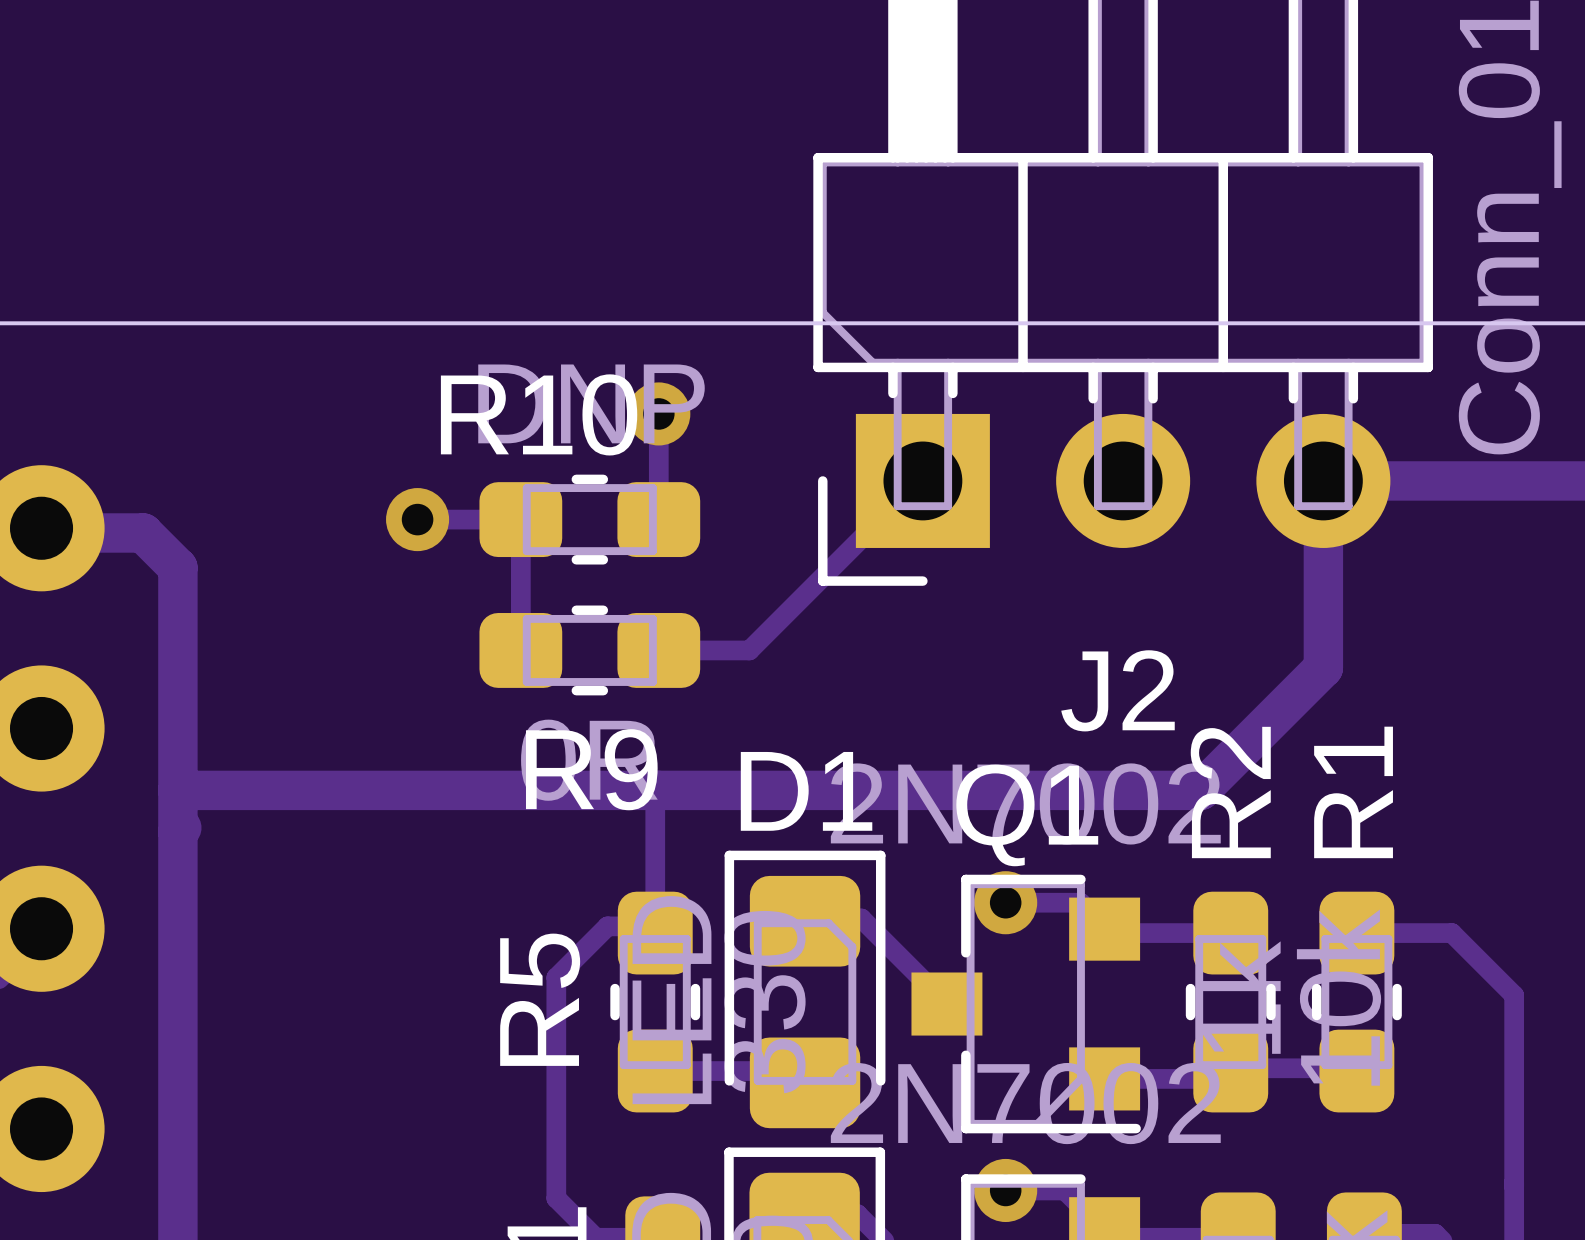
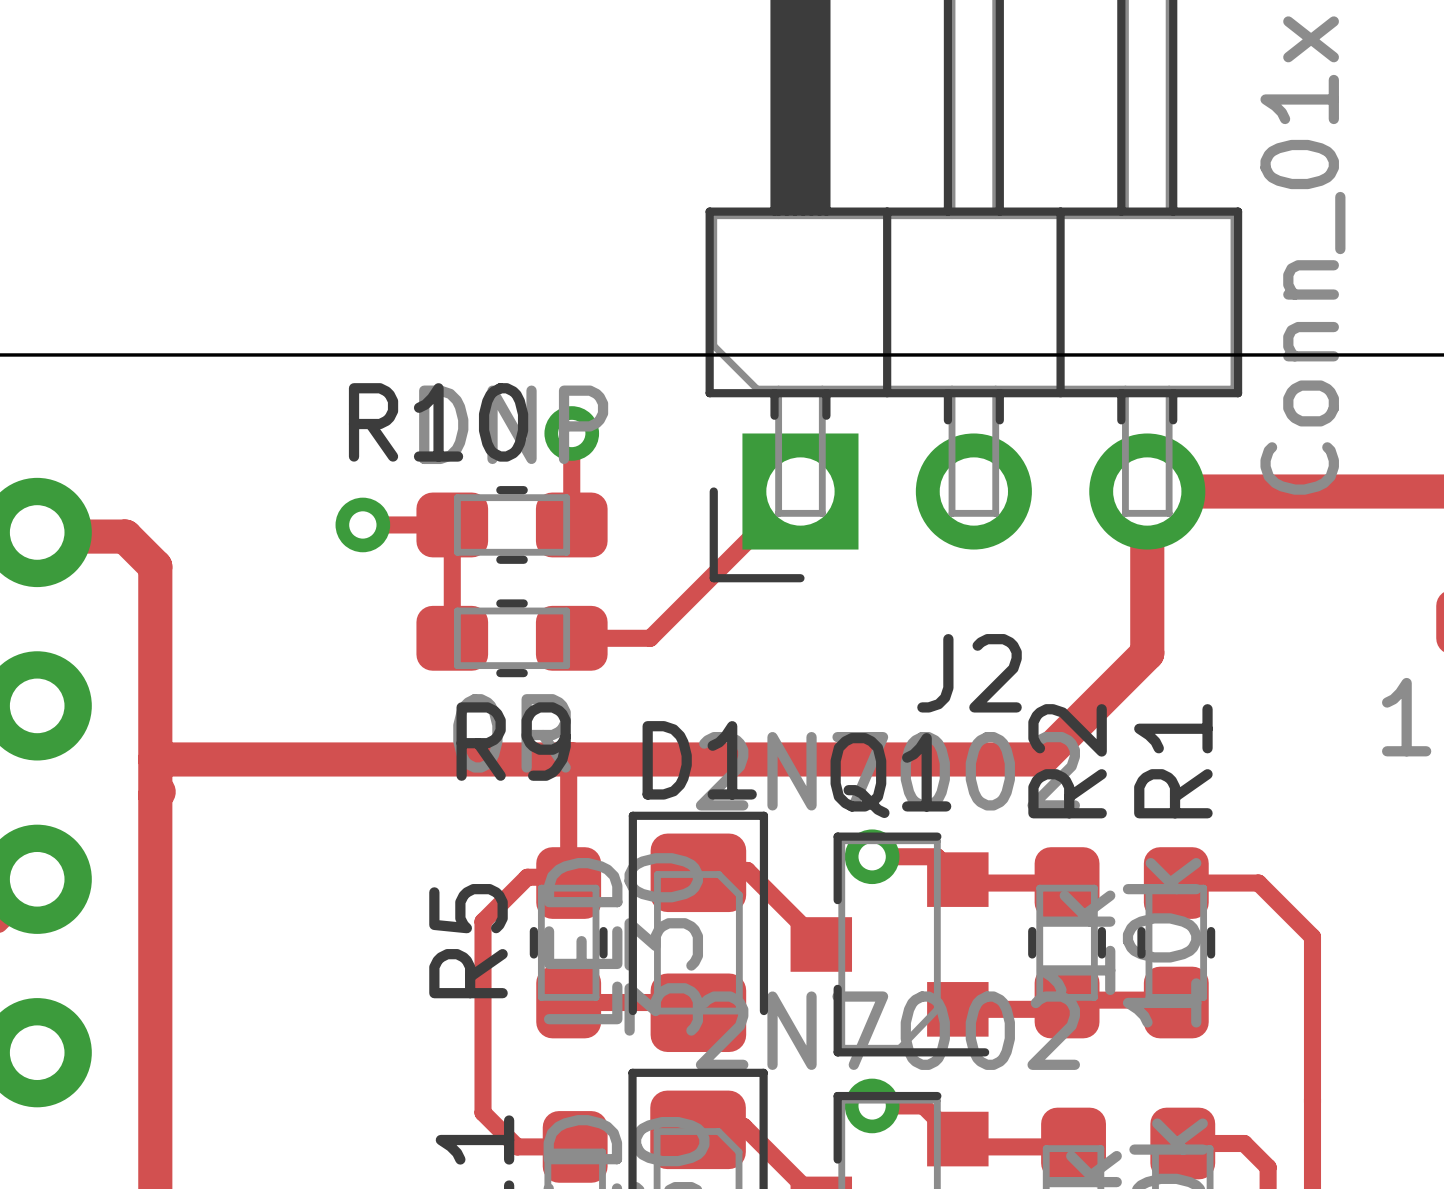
R10 name position: R10 (539, 414) -> R10 (438, 422)

